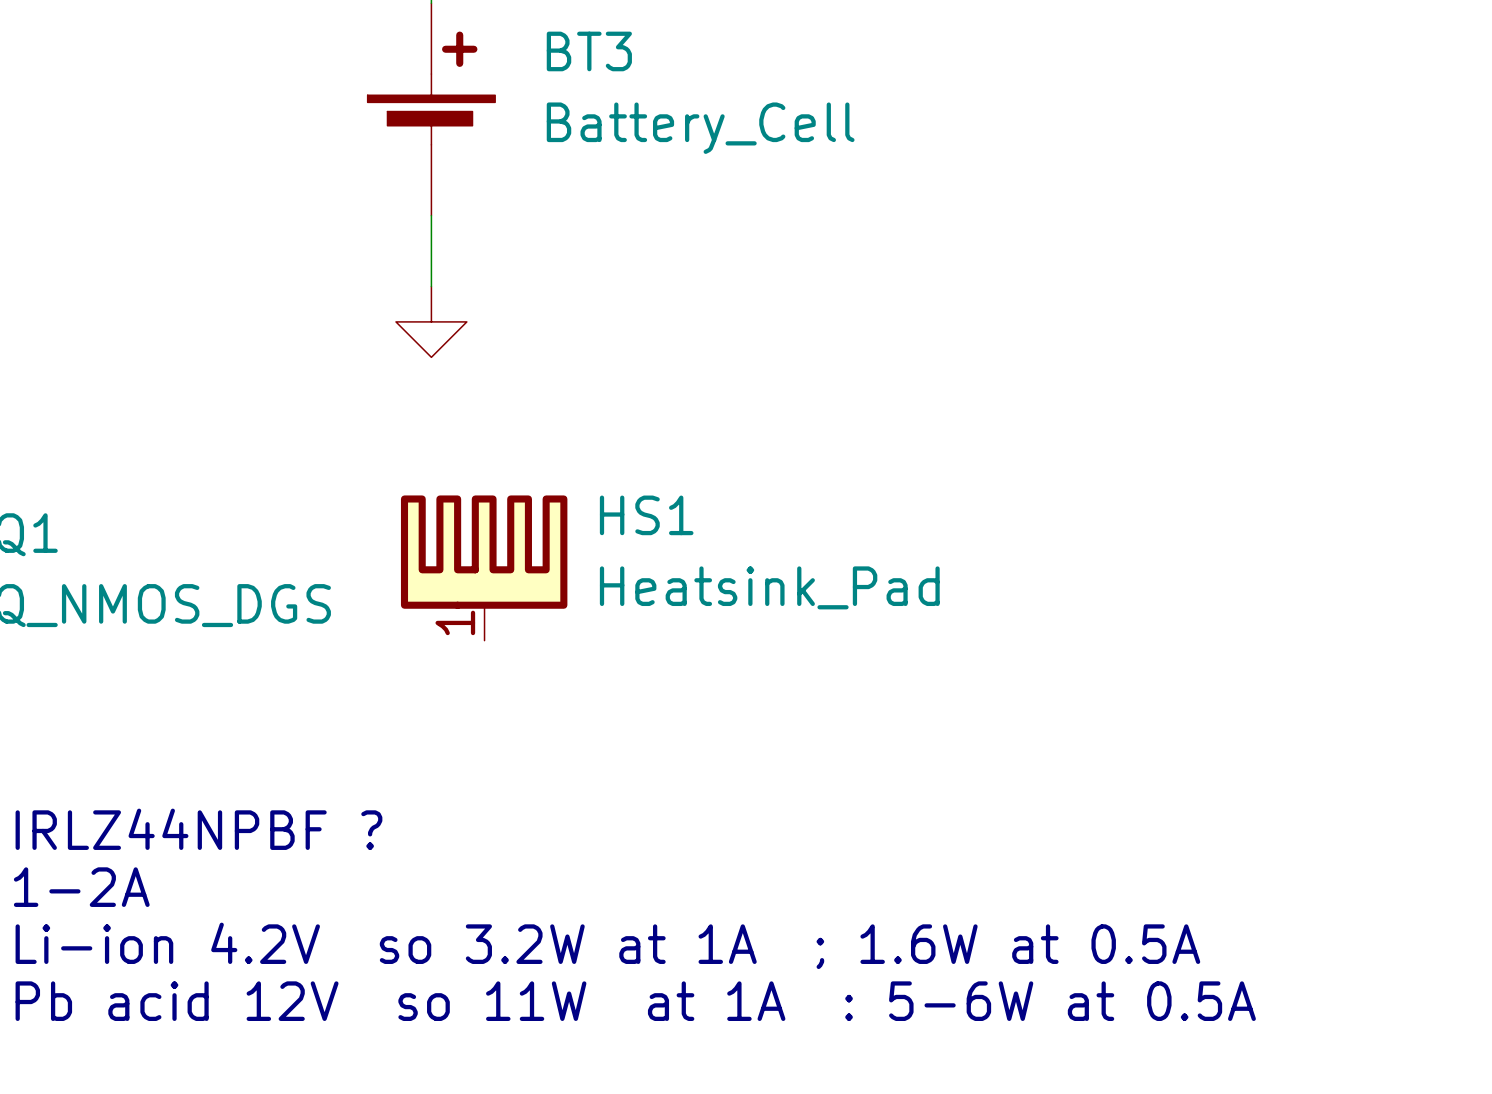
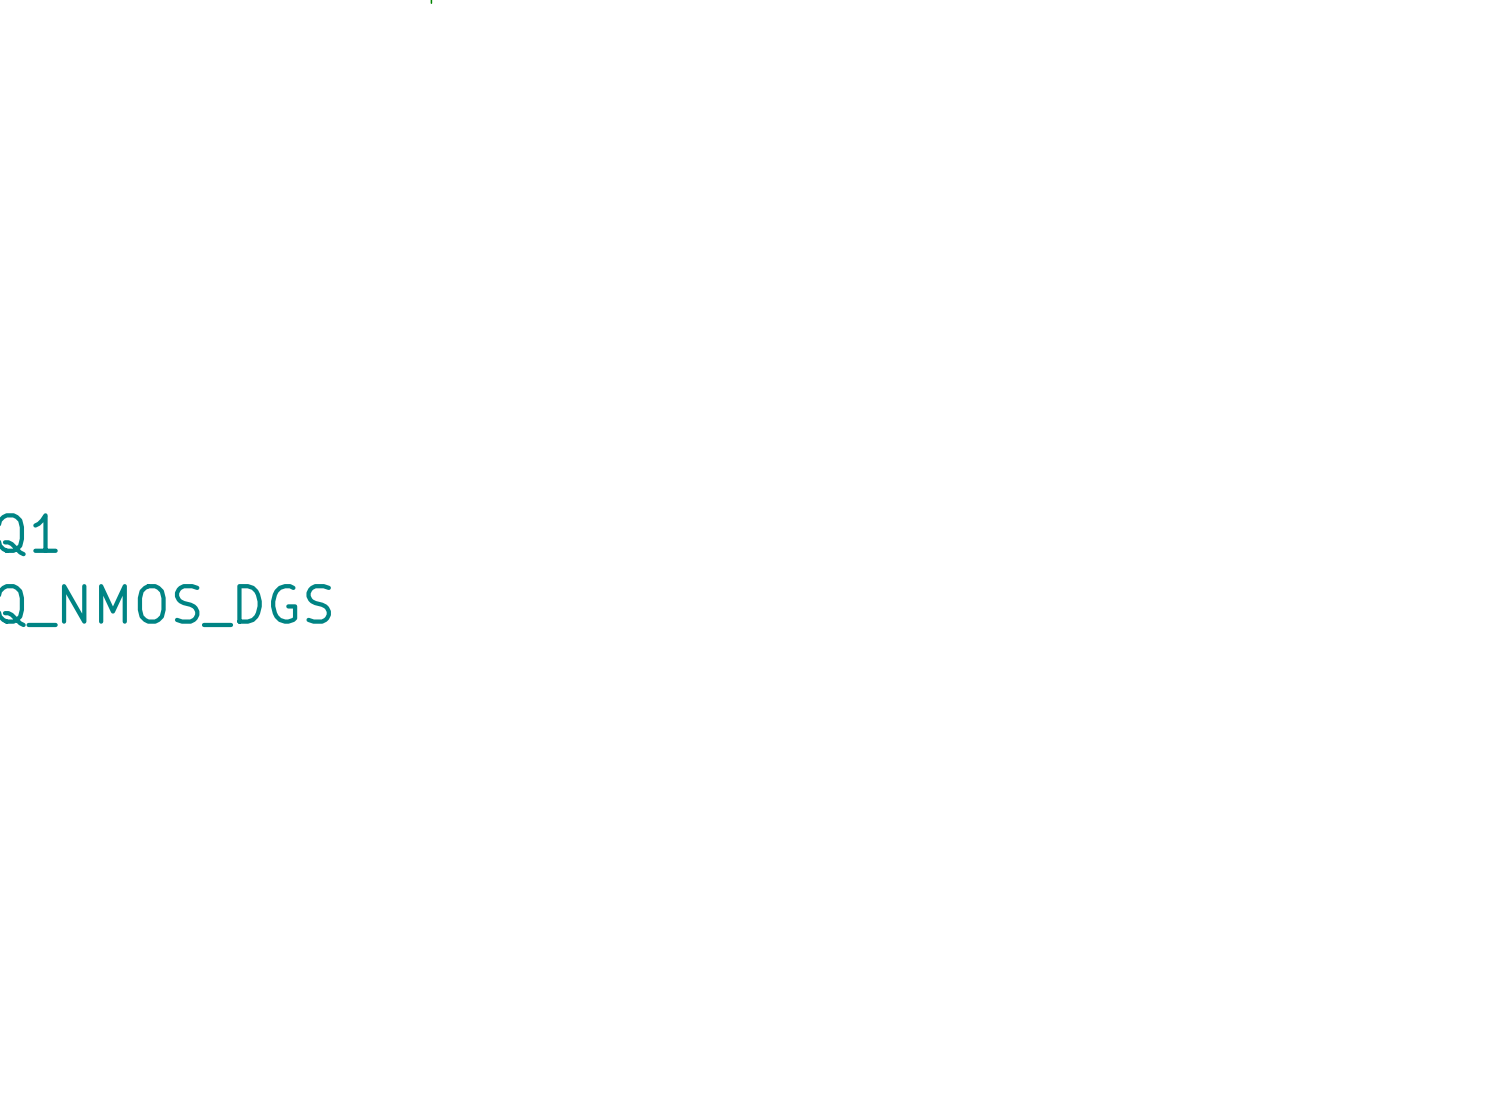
BT3: Battery_Cell (431, 109) -> none
wire: (431, 215) (431, 286) -> none
power symbol: (431, 321) -> none
HS1: Heatsink_Pad (484, 568) -> none
text: IRLZ44NPBF ? (198, 829) -> none
text: 1-2A (81, 887) -> none
text: Li-ion 4.2V so 3.2W at 1A ; 1.6W at 0.5A (607, 945) -> none
text: Pb acid 12V so 11W at 1A : 5-6W at 0.5A (635, 1001) -> none

